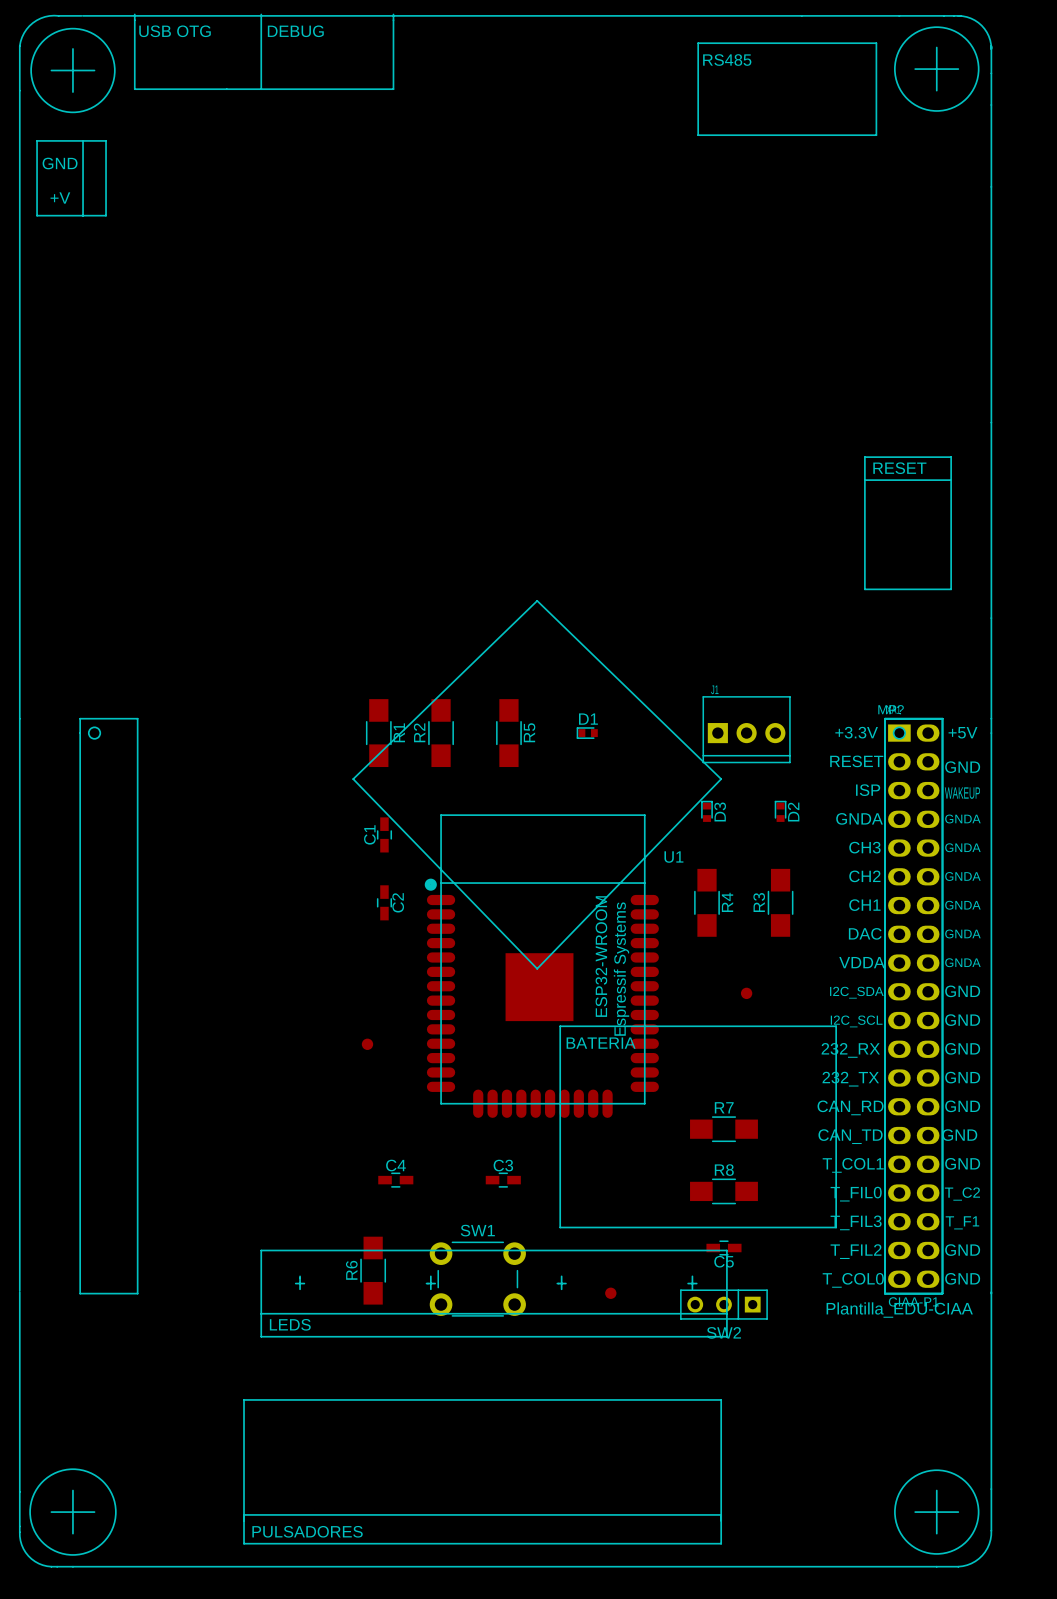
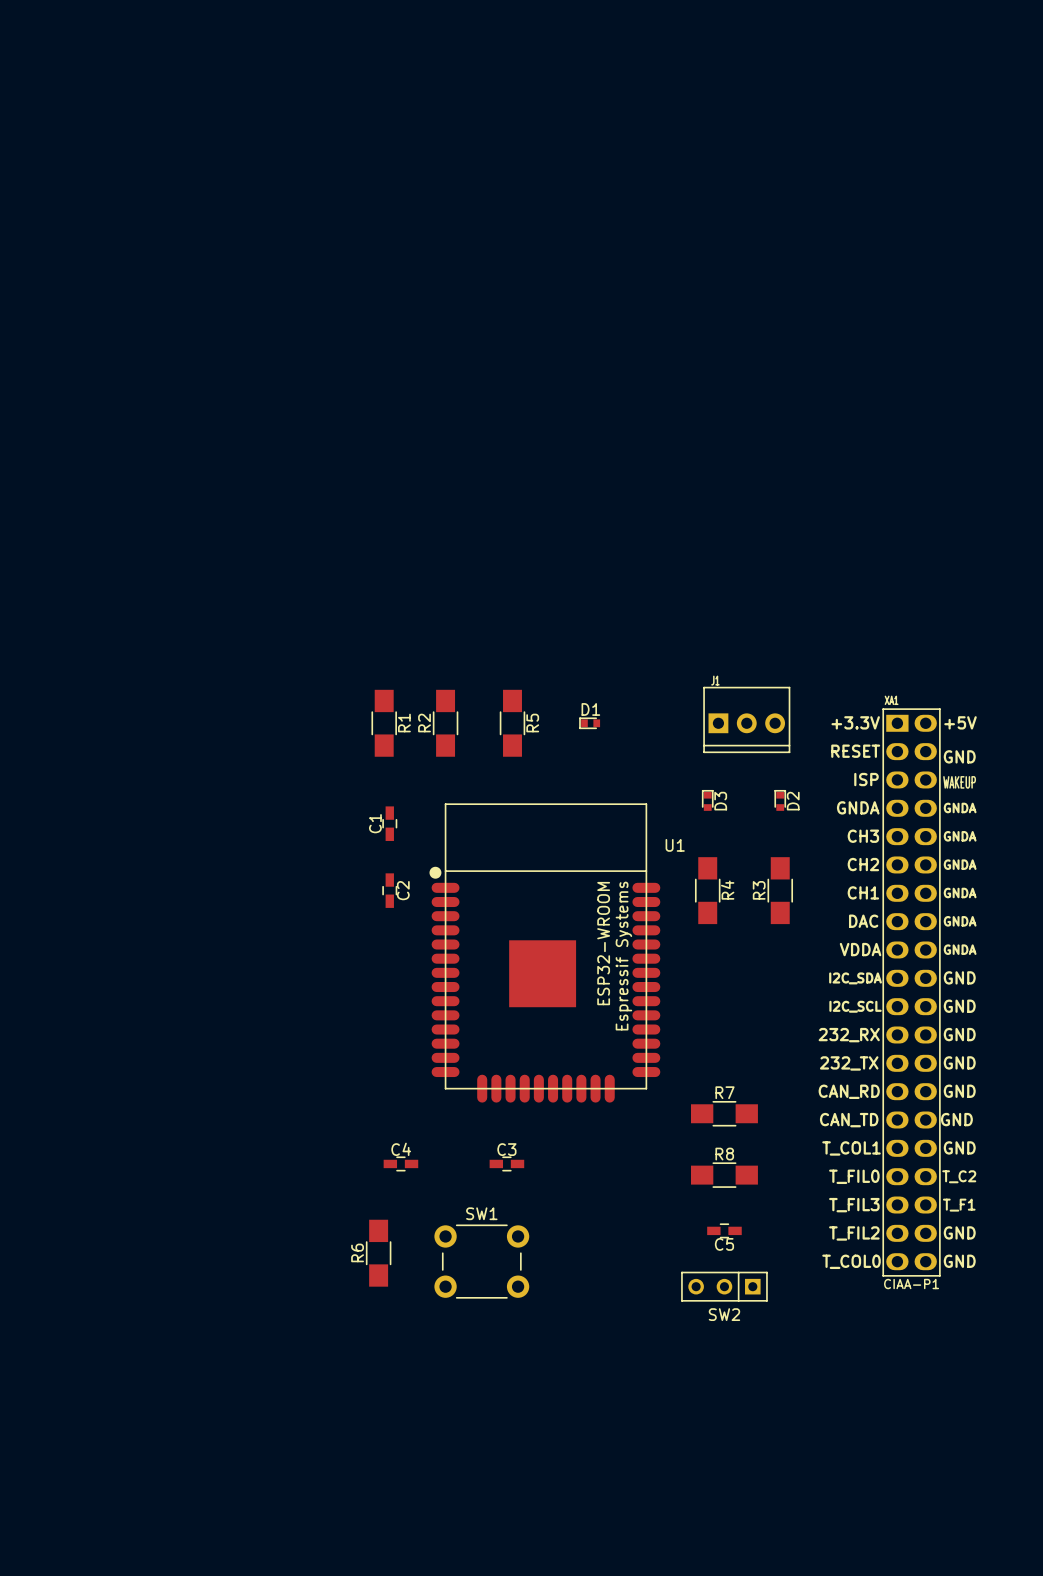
MP?: Plantilla_EDU-CIAA (505, 790) -> none
part: (746, 993) -> none
part: (367, 1044) -> none
part: (610, 1293) -> none

